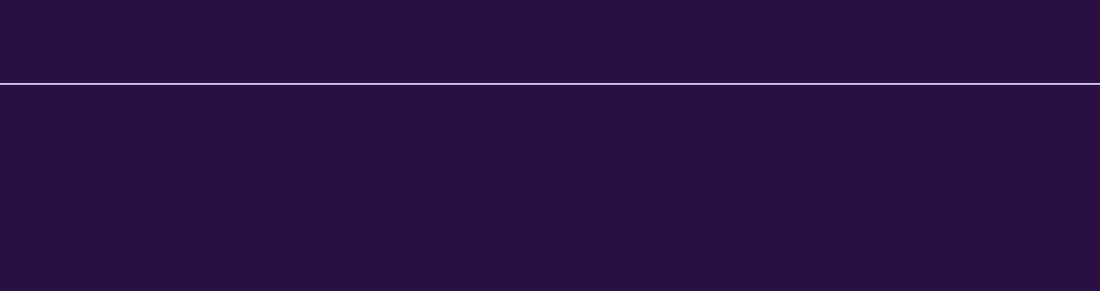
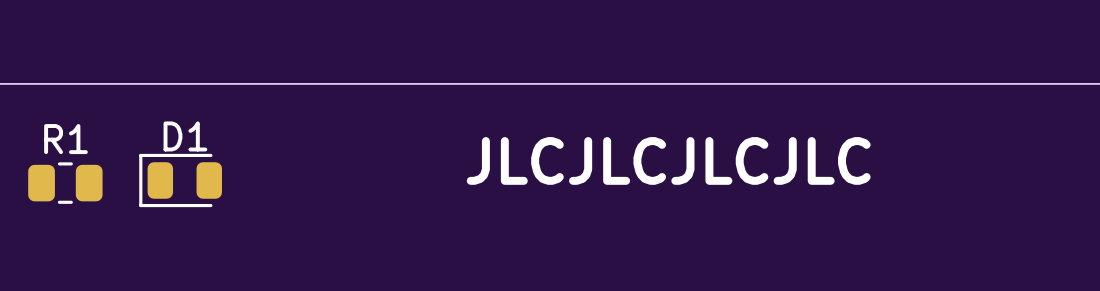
text: none -> JLCJLCJLCJLC (668, 160)
D1: none -> (180, 180)
R1: none -> (65, 183)

